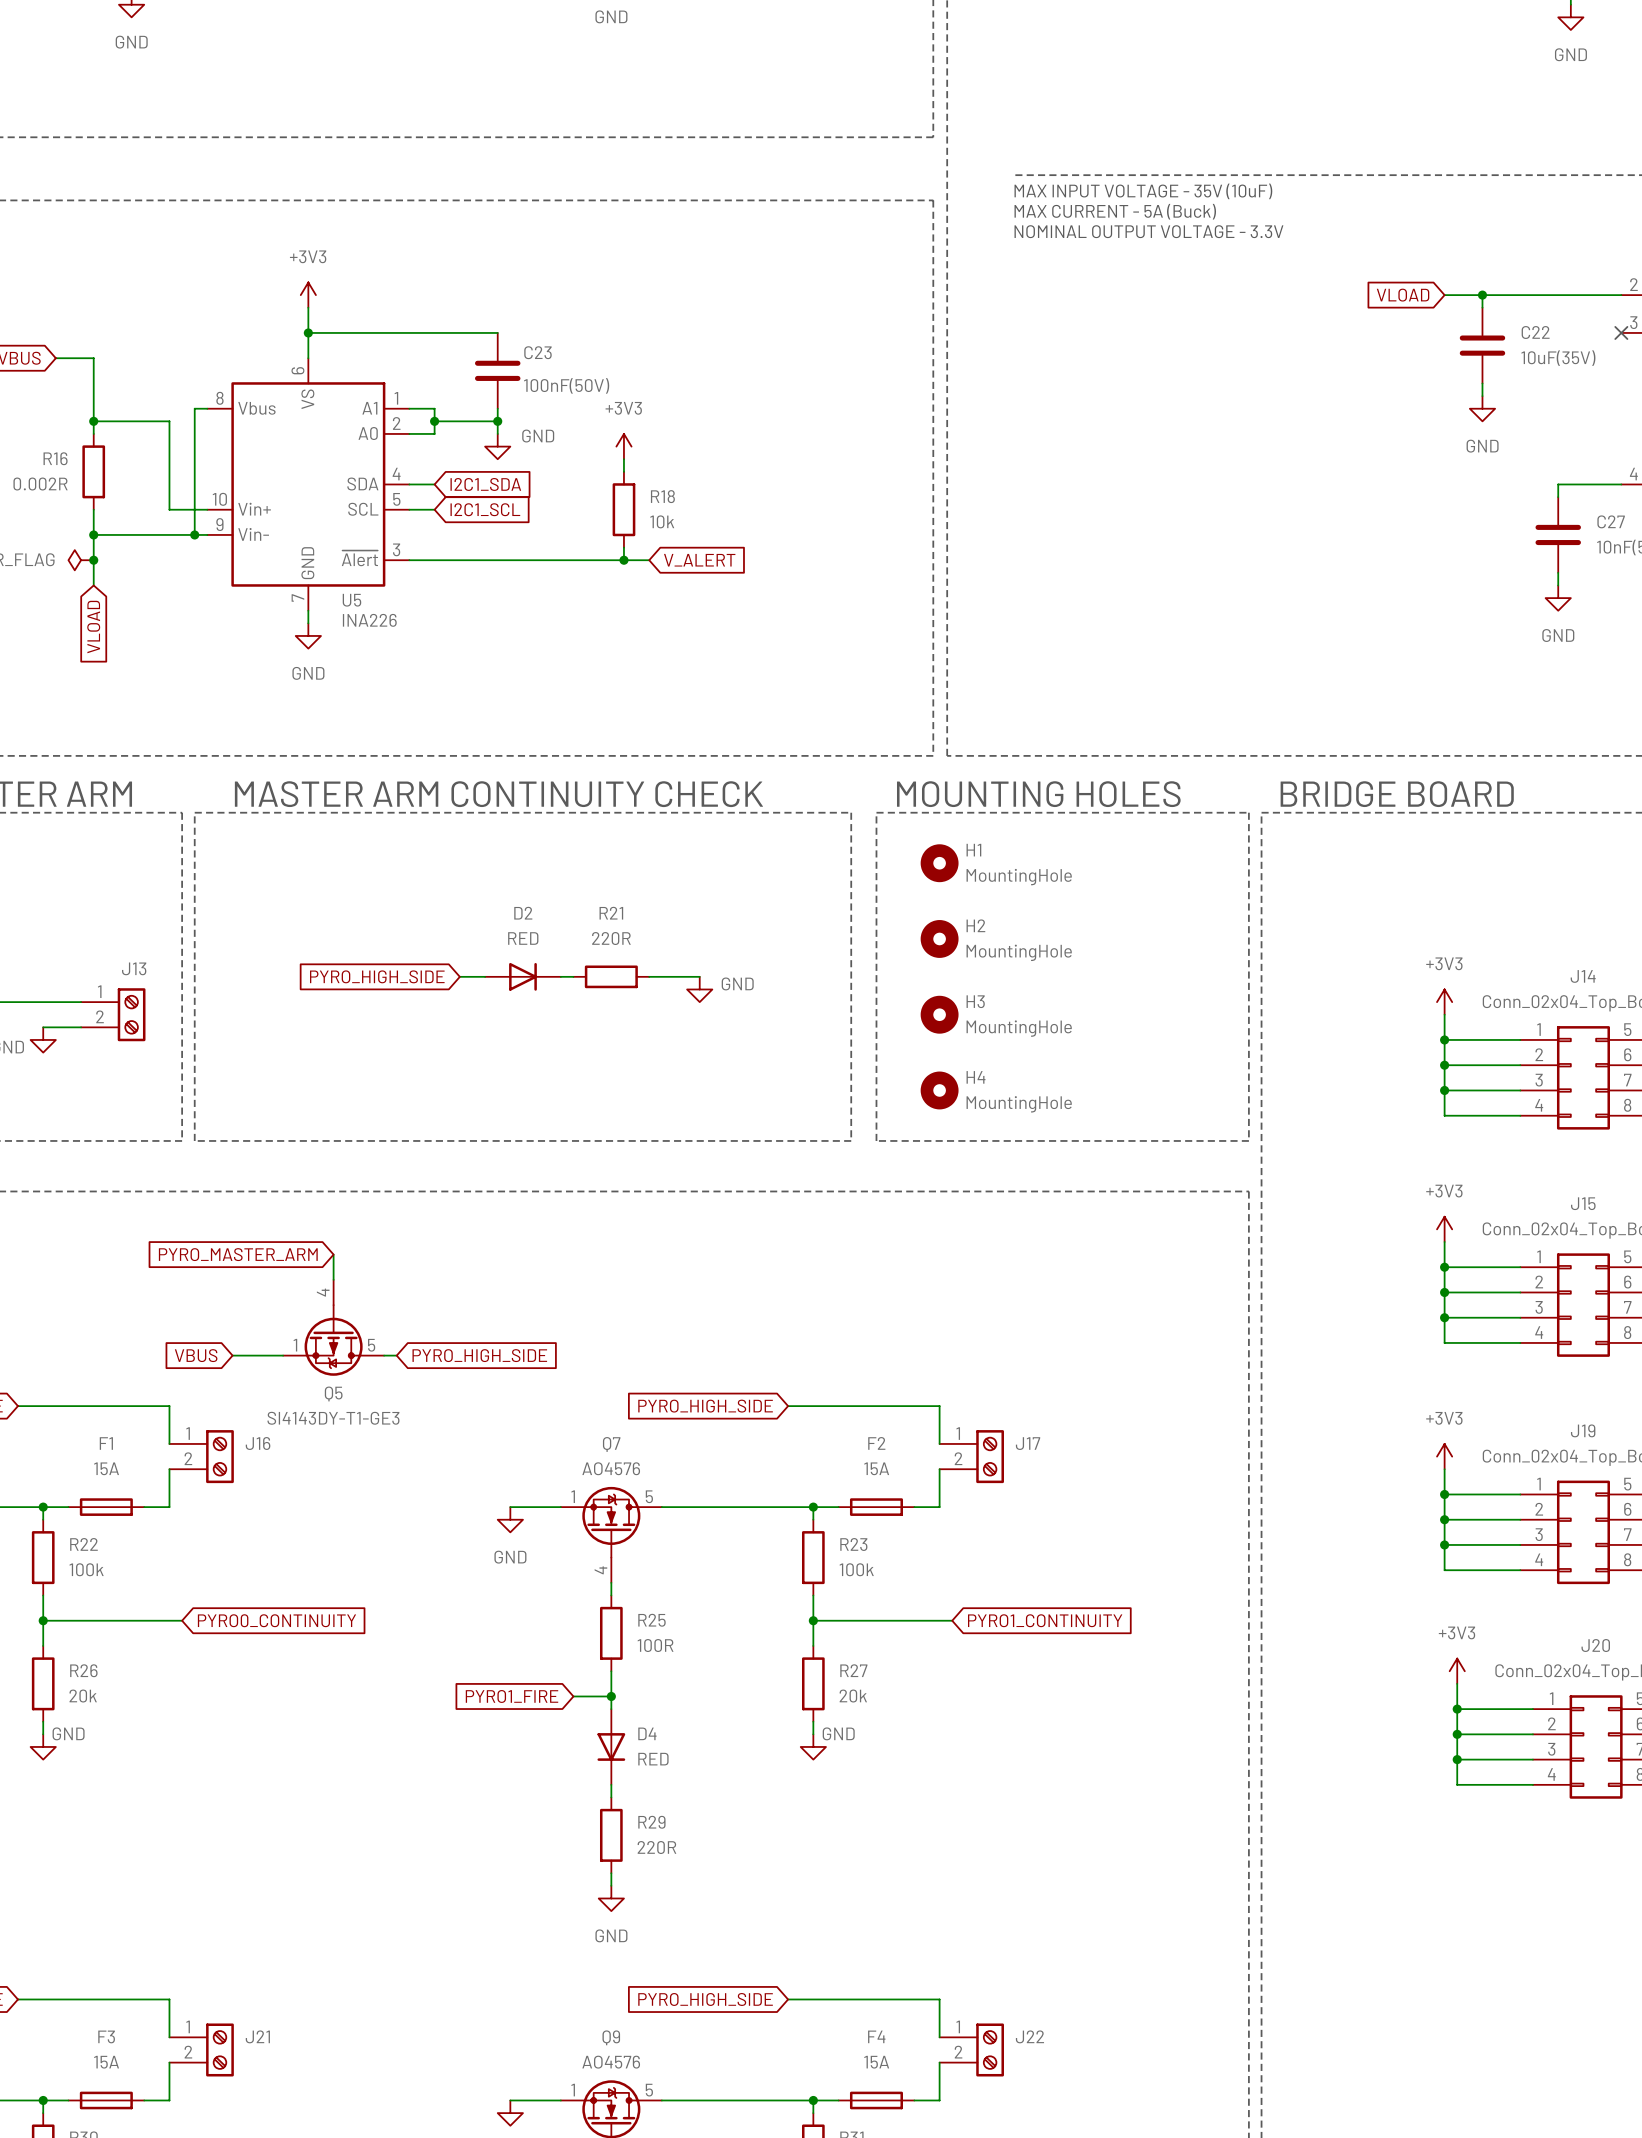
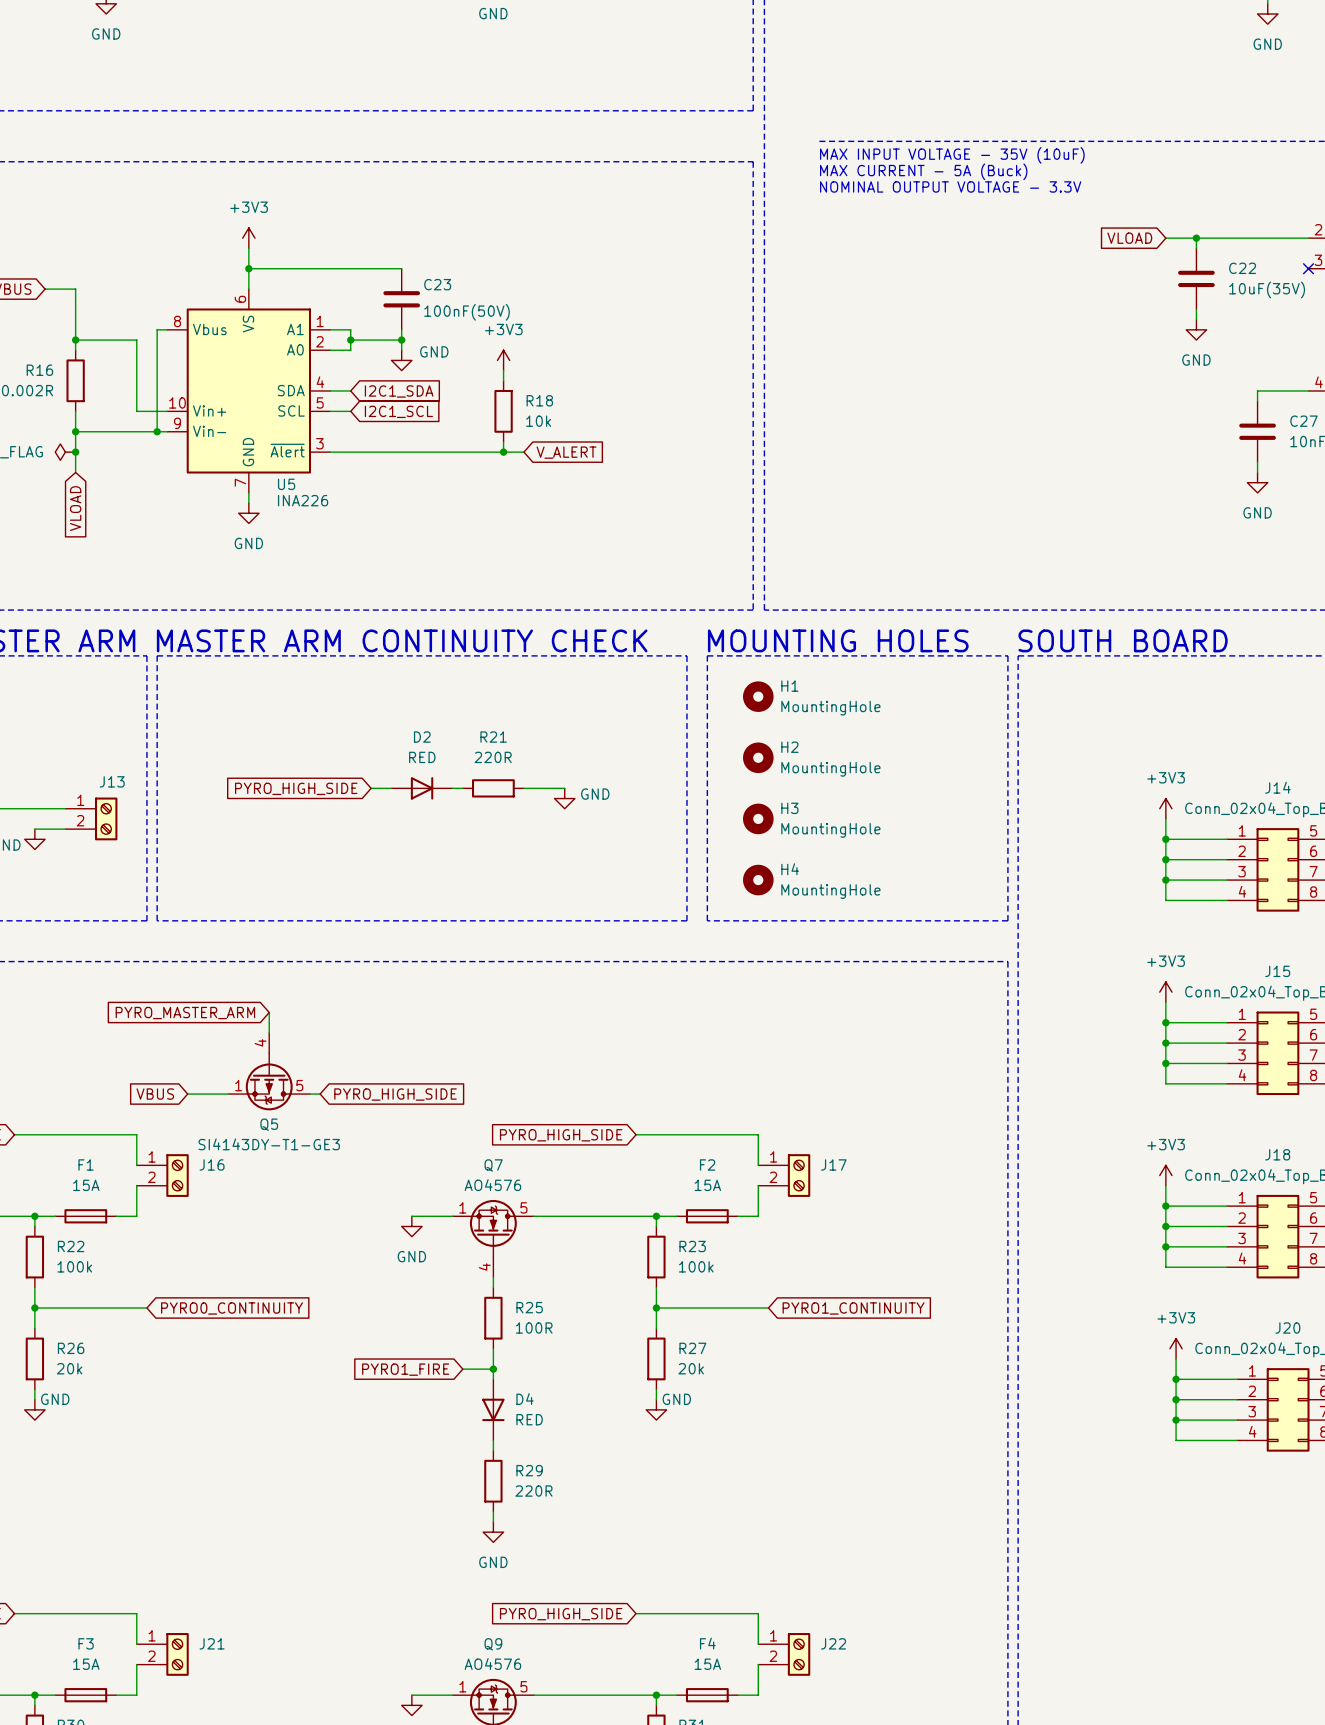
text: BRIDGE BOARD (1397, 794) -> SOUTH BOARD (1123, 640)
J19 name: J19 (1583, 1430) -> J18 (1277, 1154)

